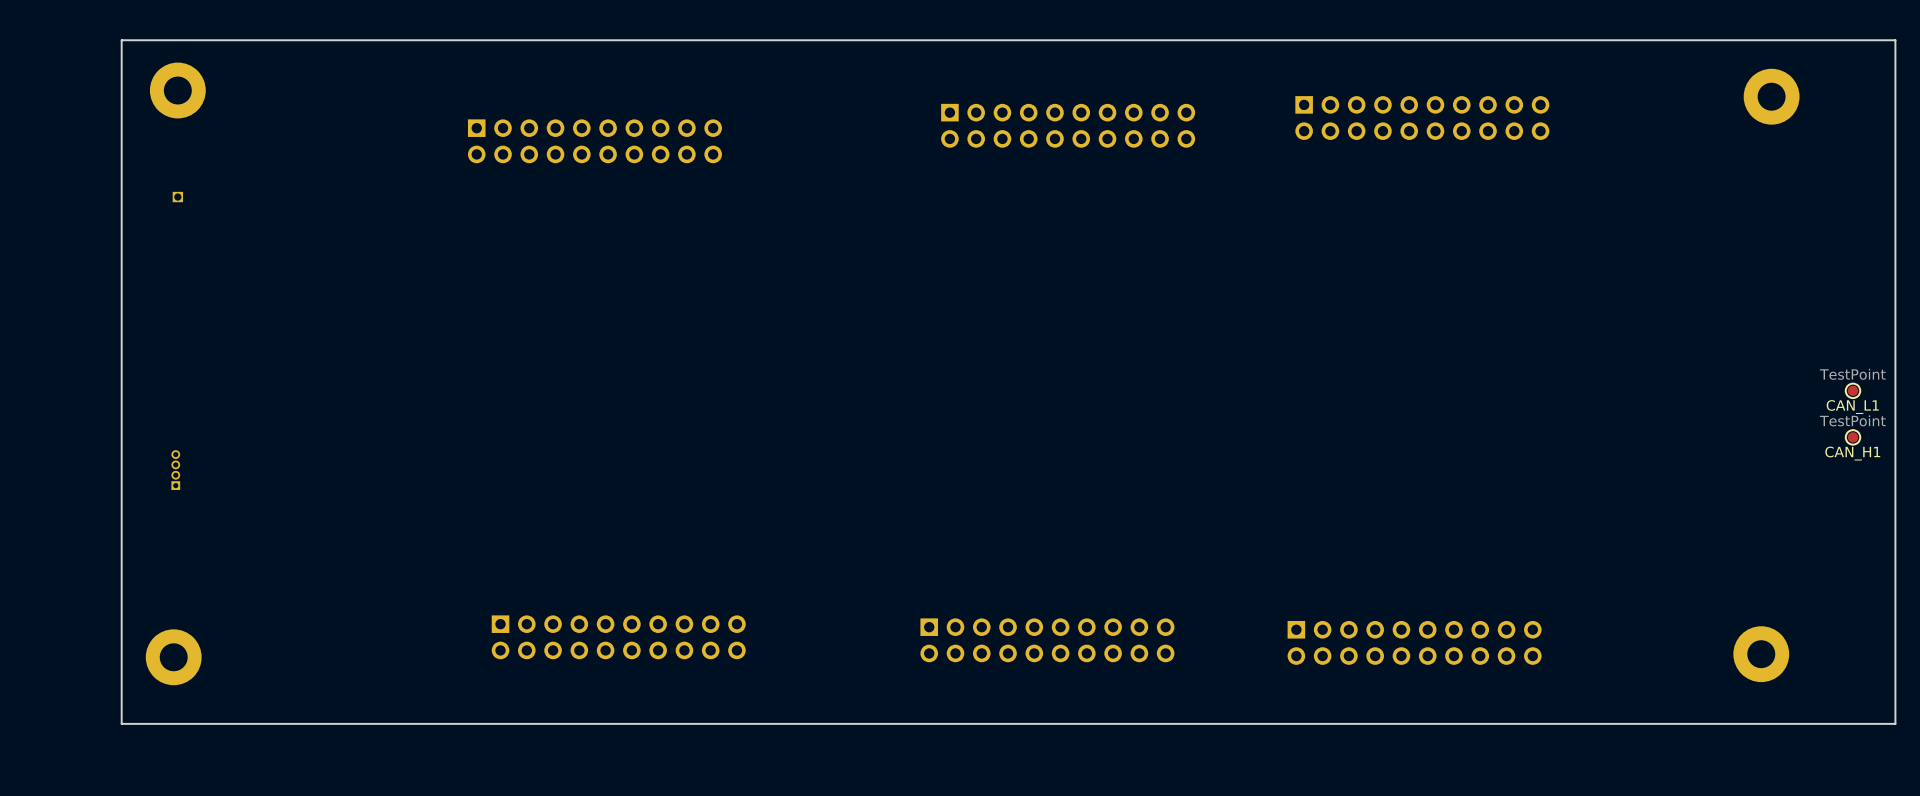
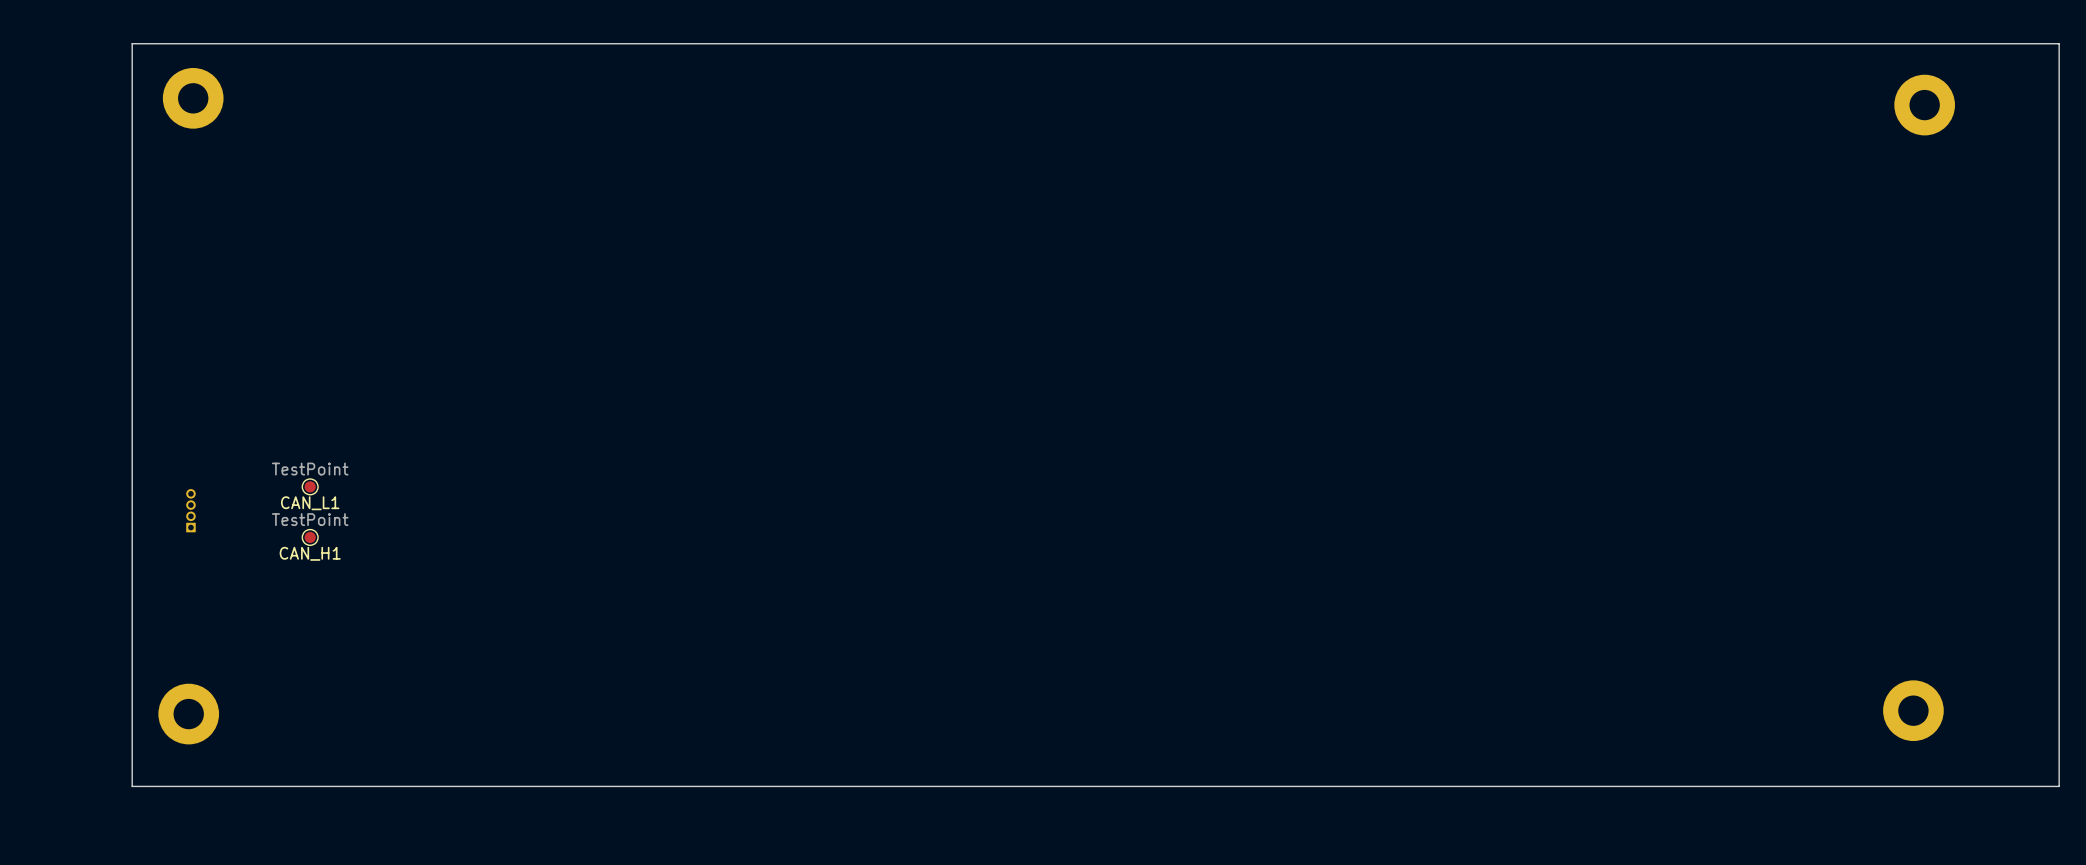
part: (1422, 118) -> none
part: (1068, 125) -> none
part: (594, 141) -> none
part: (177, 197) -> none
CAN_L1 position: (1853, 390) -> (310, 486)
CAN_H1 position: (1853, 437) -> (310, 537)
part: (618, 637) -> none
part: (1047, 640) -> none
part: (1414, 642) -> none

